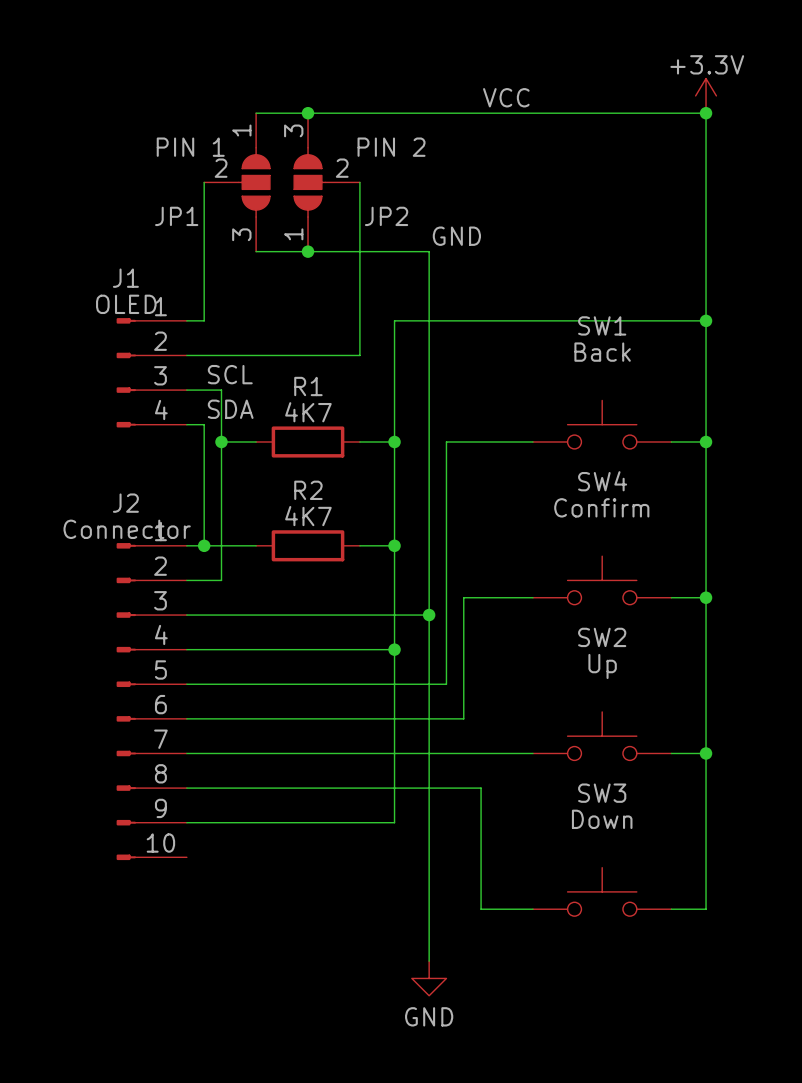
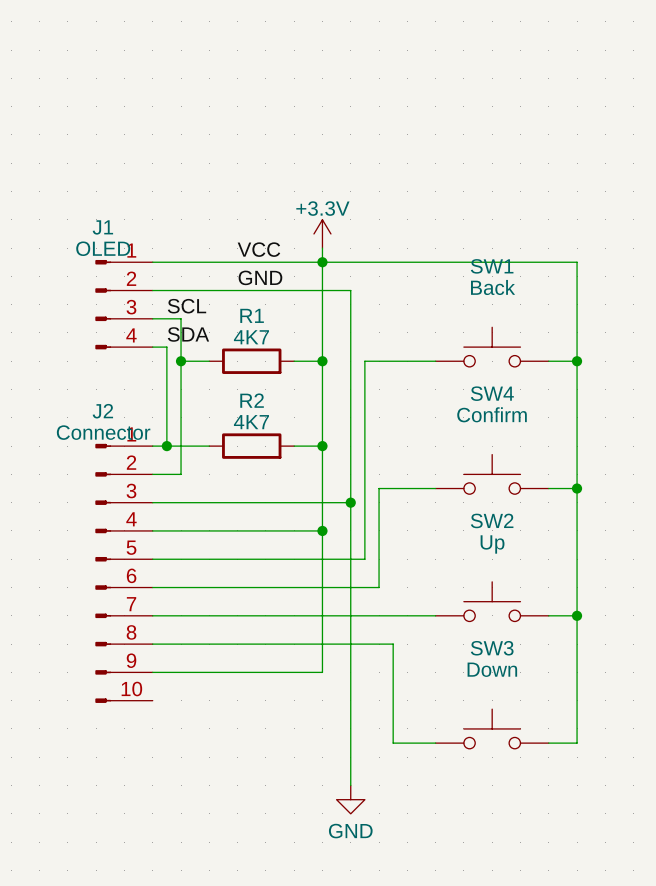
power symbol: +3.3V (706, 95) -> none
label position: VCC (506, 97) -> VCC (258, 249)
wire: (256, 113) (706, 113) (706, 320) -> none
junction: (308, 113) -> none
junction: (706, 113) -> none
wire: (204, 182) (204, 320) -> (322, 248) (322, 262) (166, 262)
JP1: PIN 1 (237, 182) -> none
JP2: PIN 2 (327, 182) -> none
wire: (359, 182) (359, 355) -> none
label position: GND (456, 236) -> GND (260, 277)
wire: (256, 251) (429, 251) (429, 355) -> (294, 290) (350, 290)
junction: (308, 251) -> none
power symbol: none -> +3.3V (322, 233)
junction: none -> (322, 262)
junction: (706, 320) -> none

